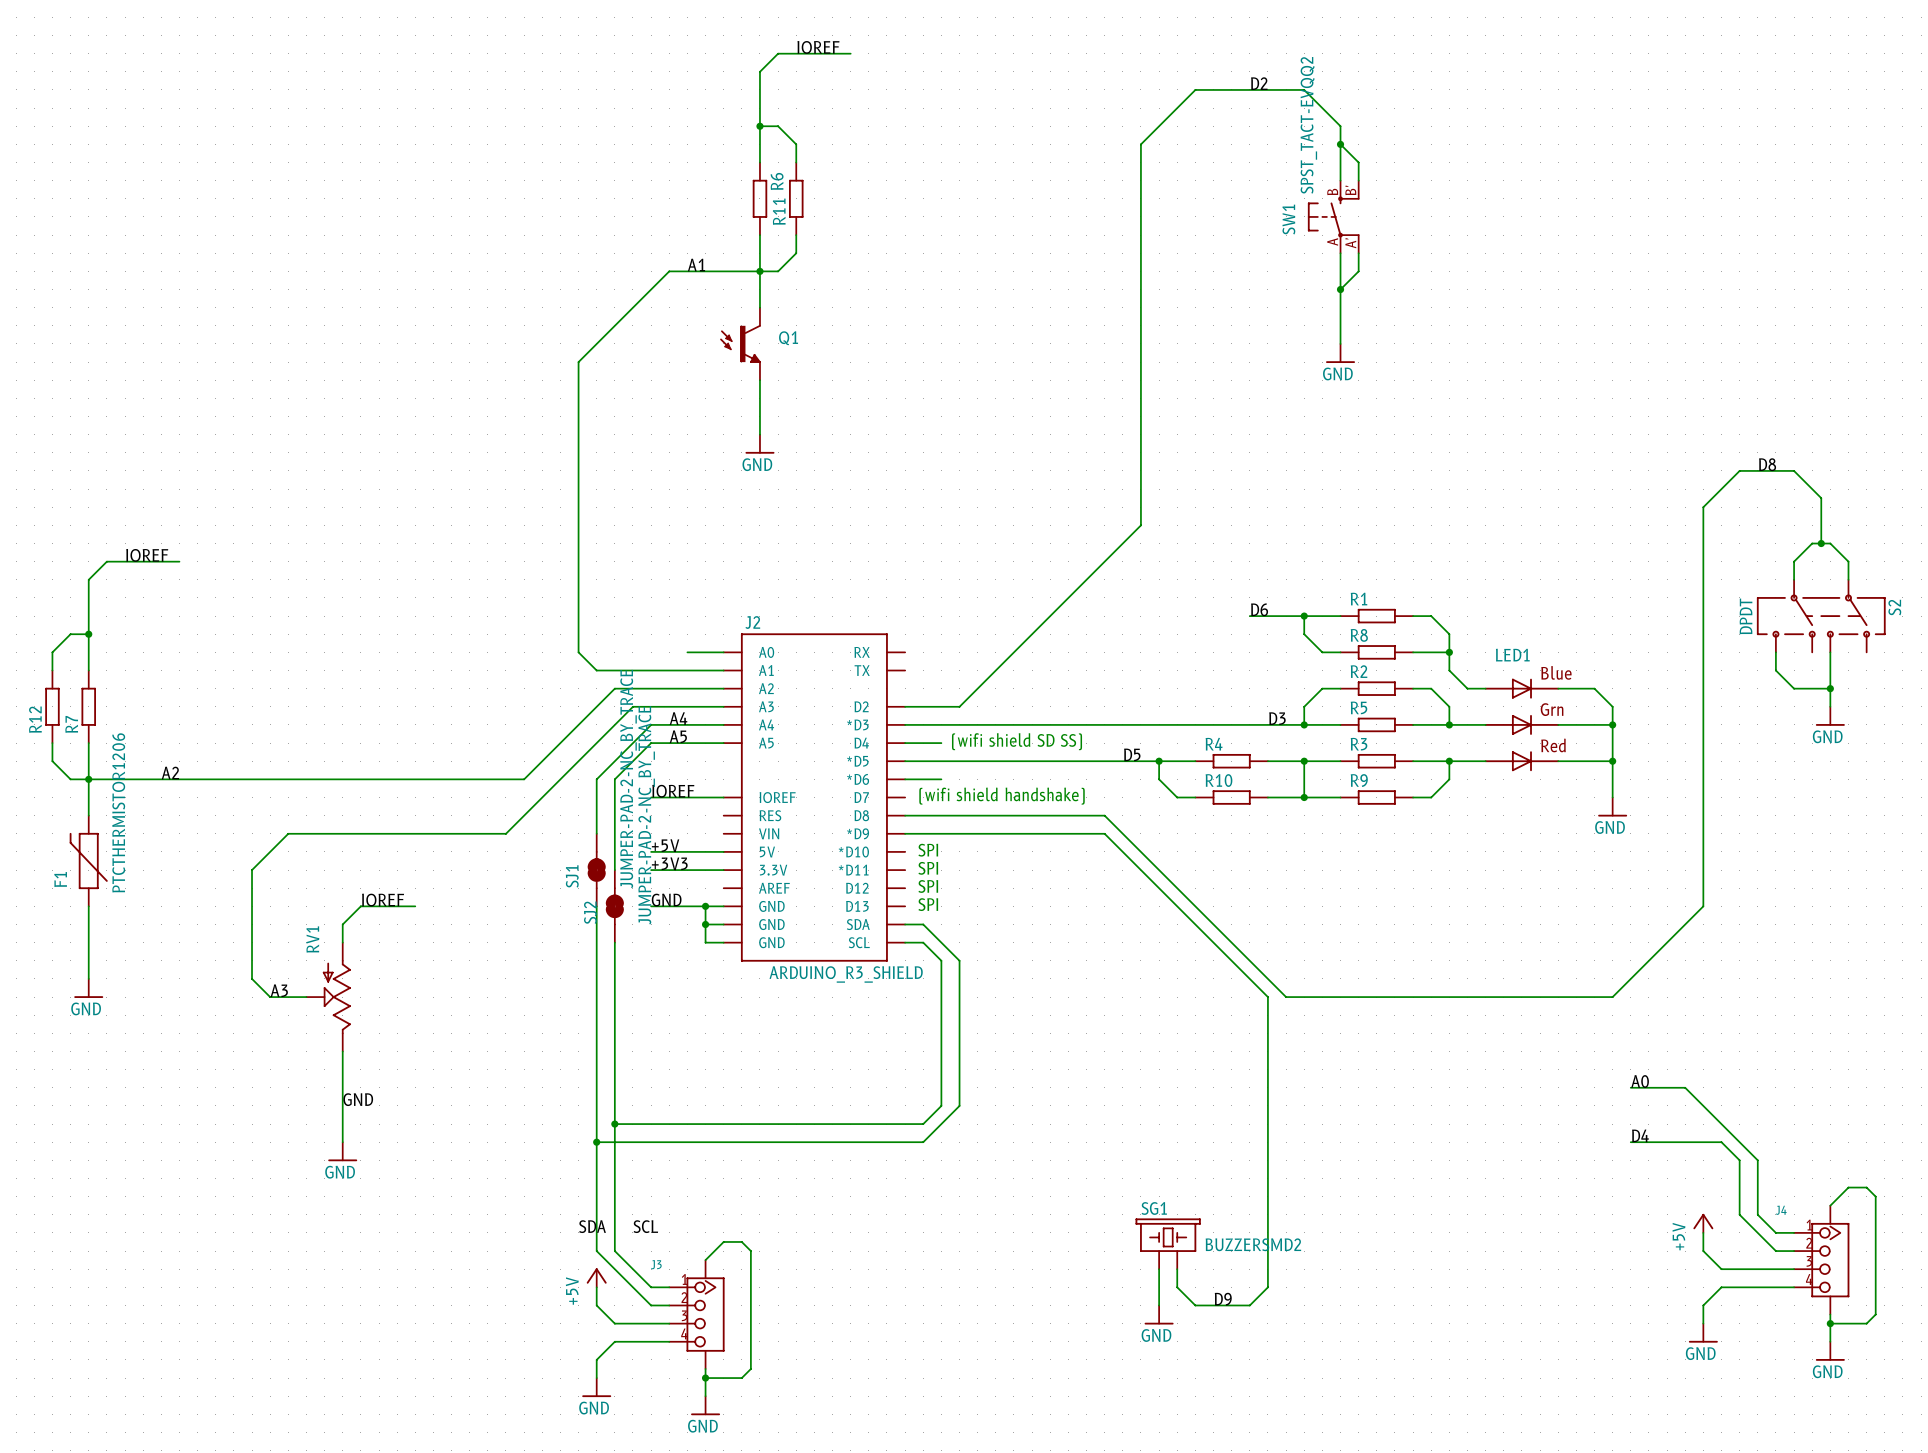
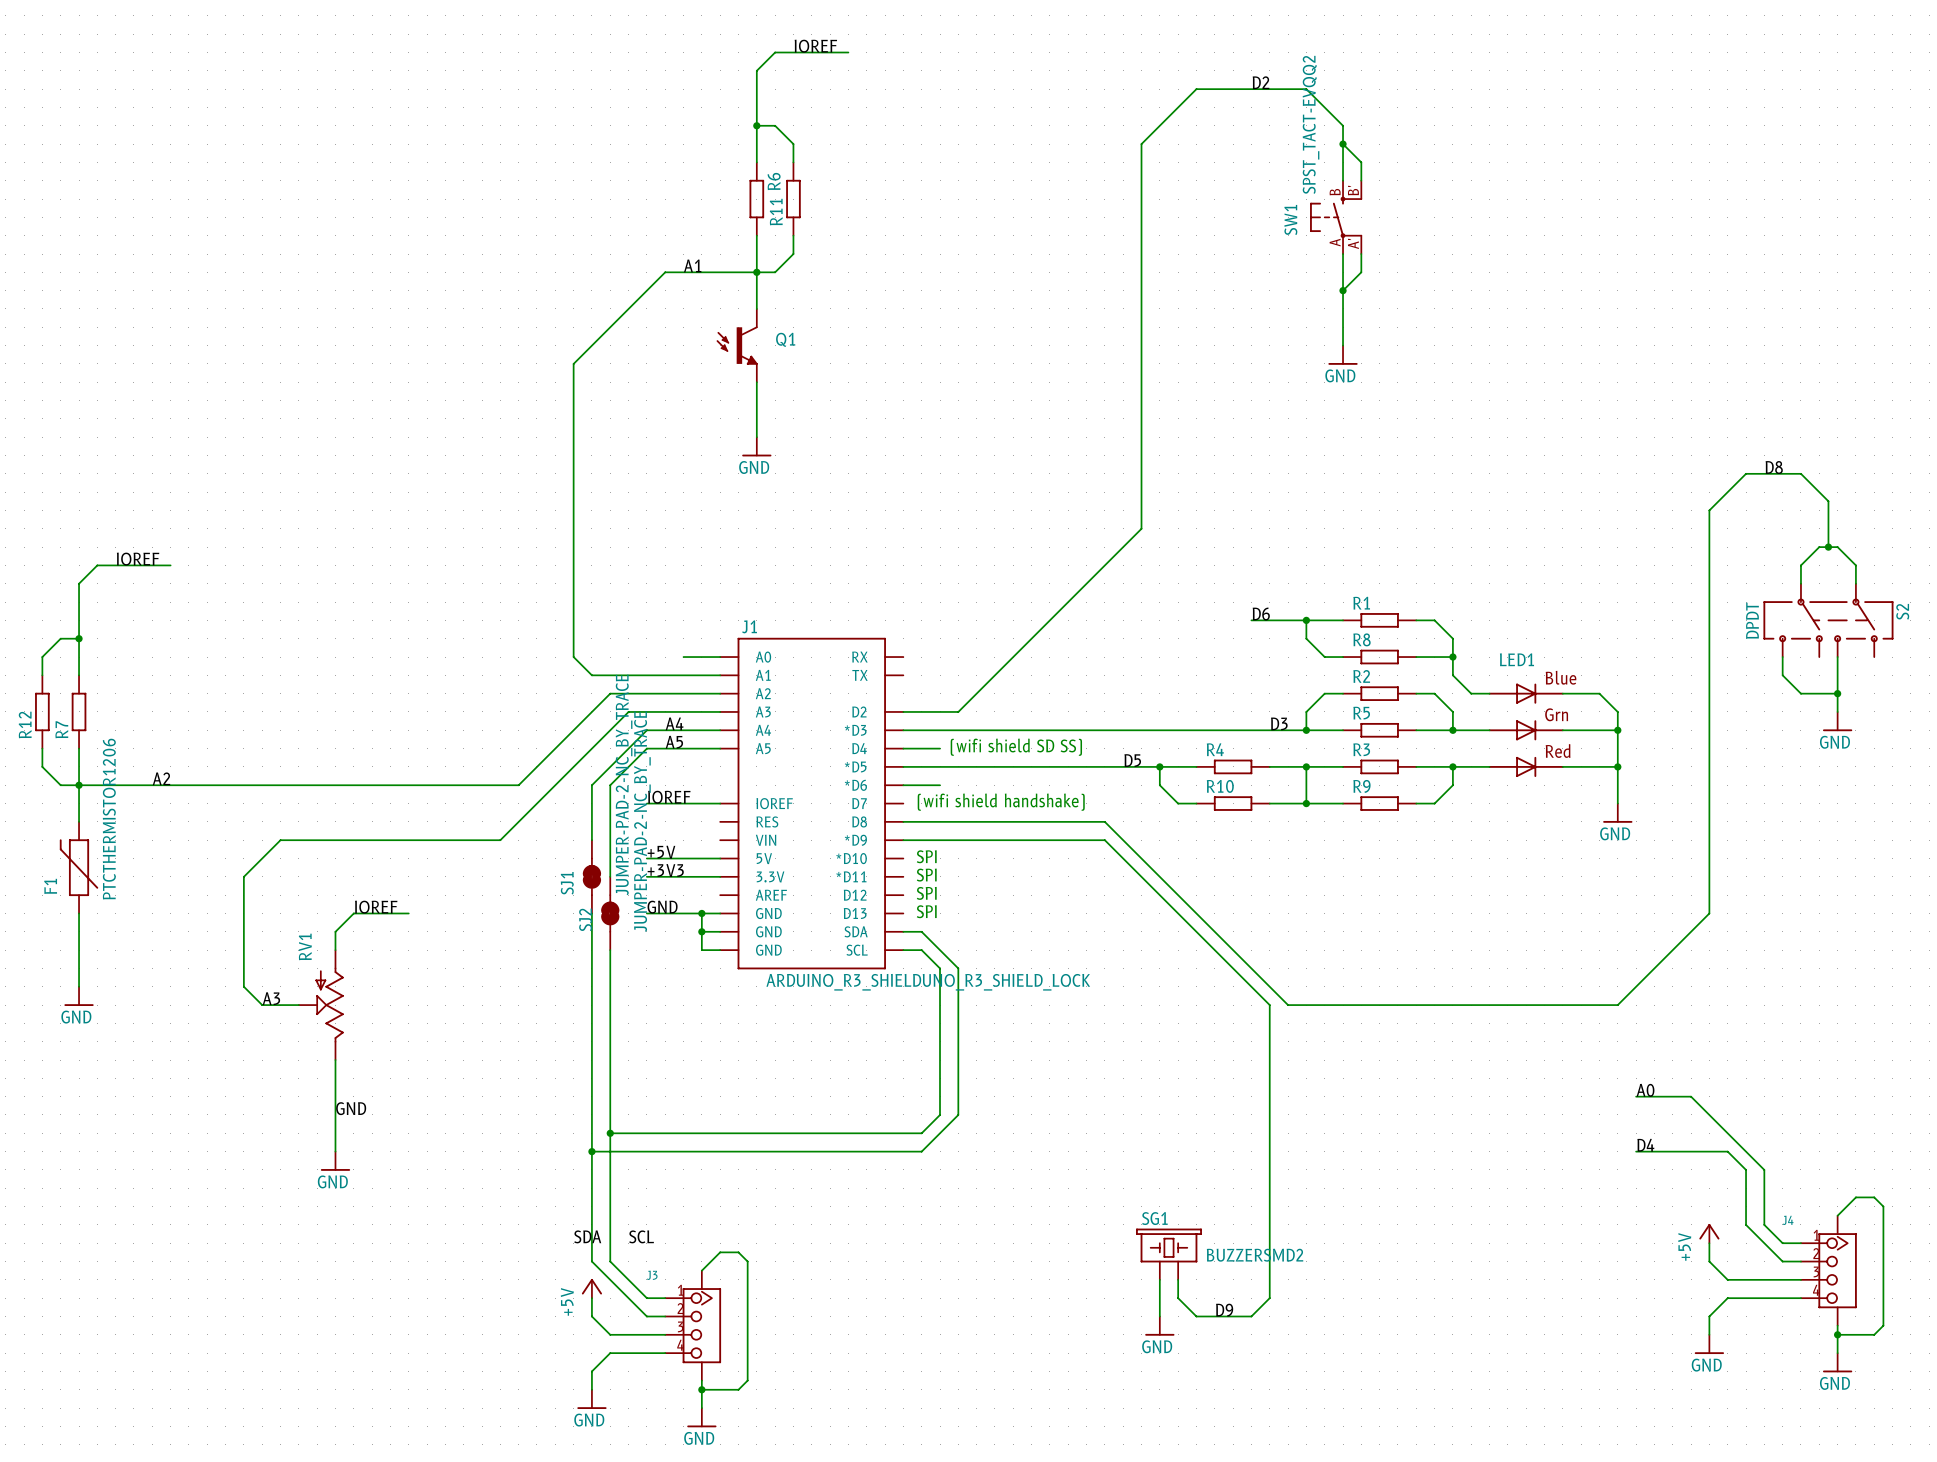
J2 name: J2 (752, 622) -> J1 (749, 626)
J2 value: ARDUINO_R3_SHIELD (846, 974) -> ARDUINO_R3_SHIELDUNO_R3_SHIELD_LOCK (928, 982)

